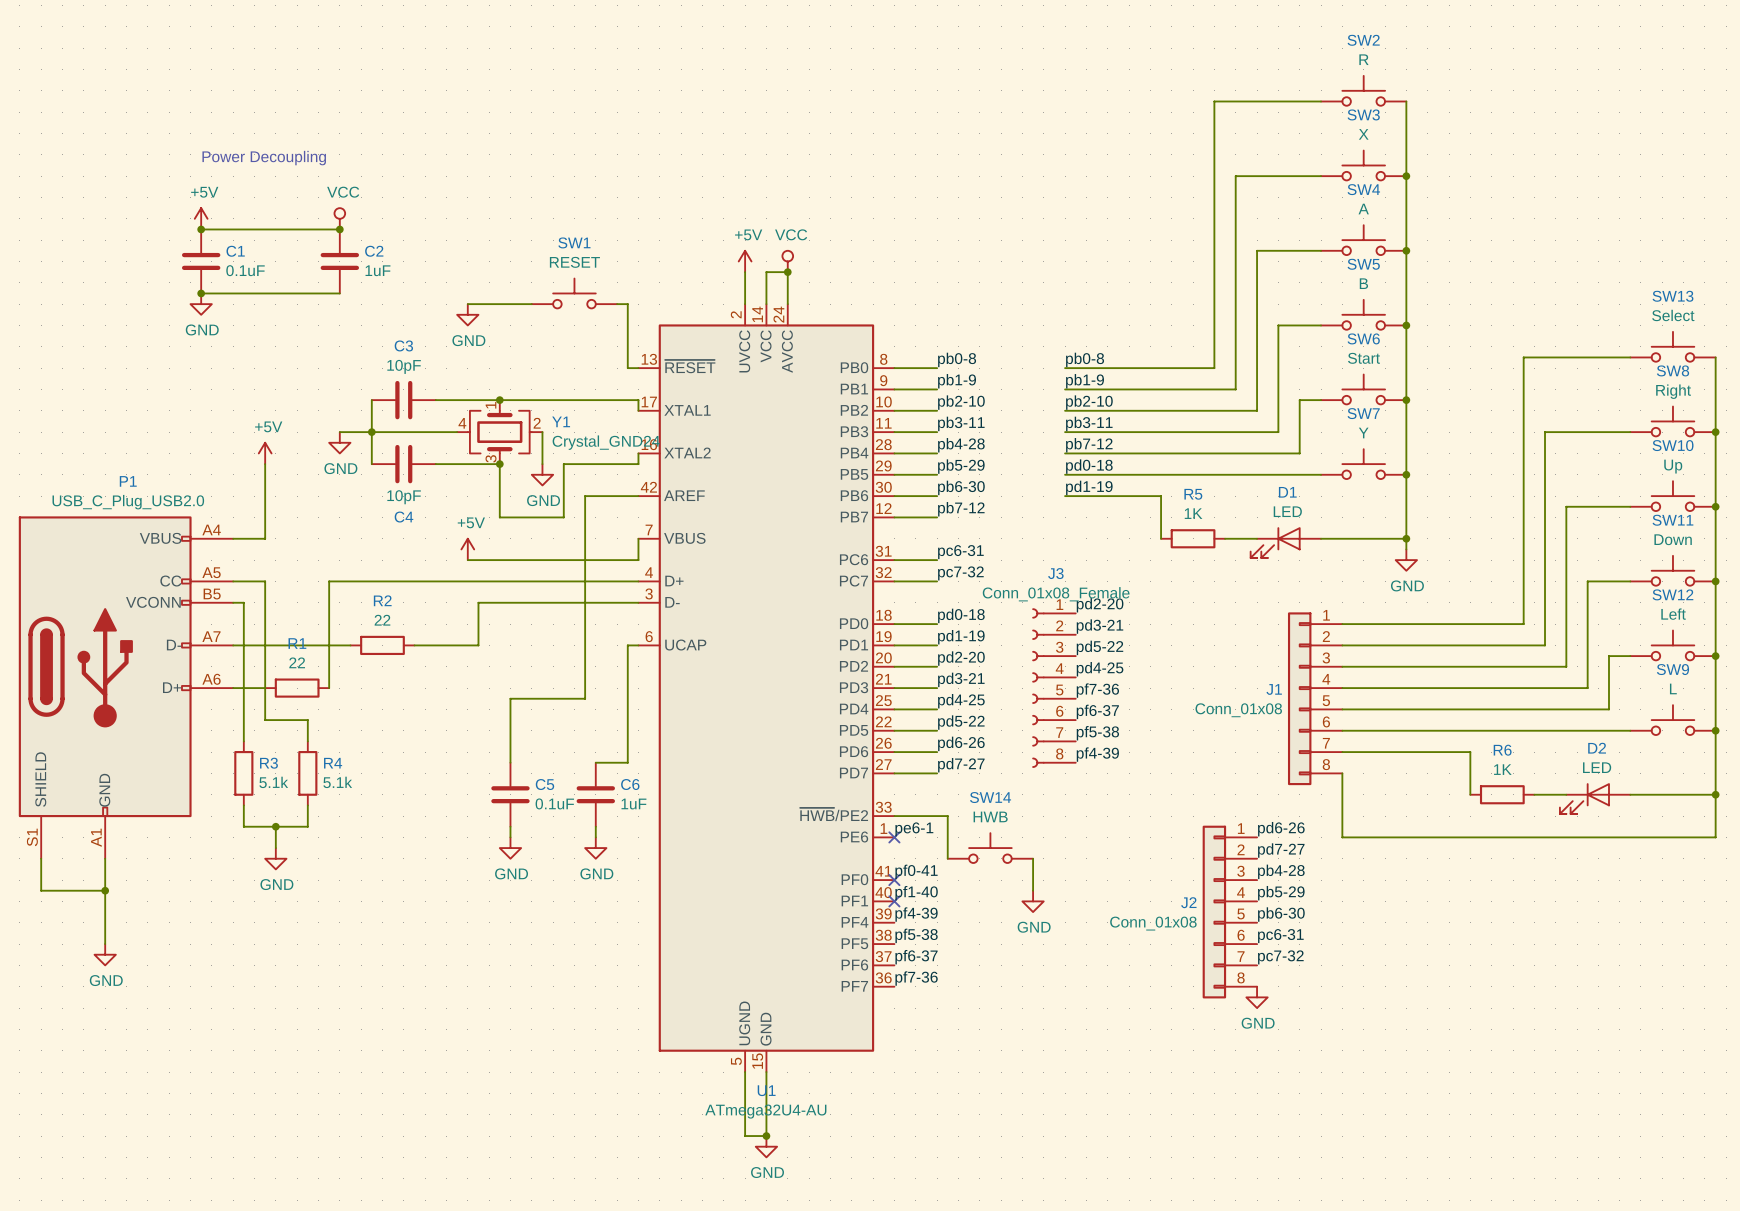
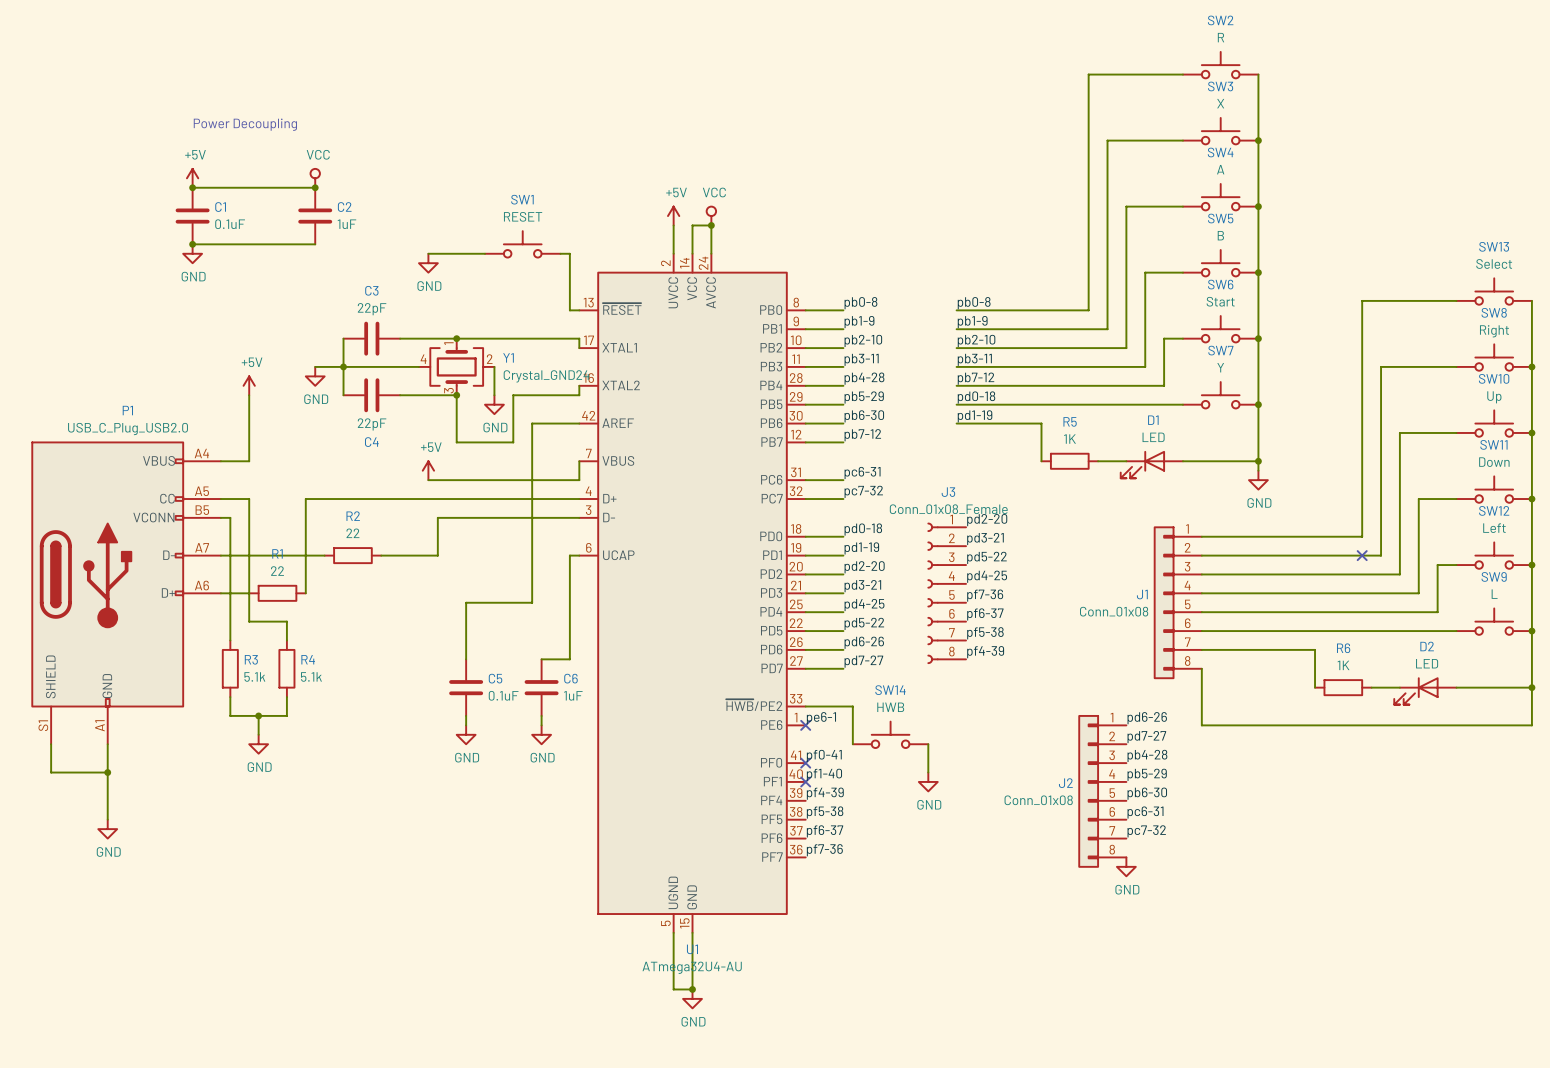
C3 value: 10pF (404, 366) -> 22pF (372, 309)
C4 value: 10pF (404, 497) -> 22pF (372, 424)
no-connect mark: none -> (1362, 555)

